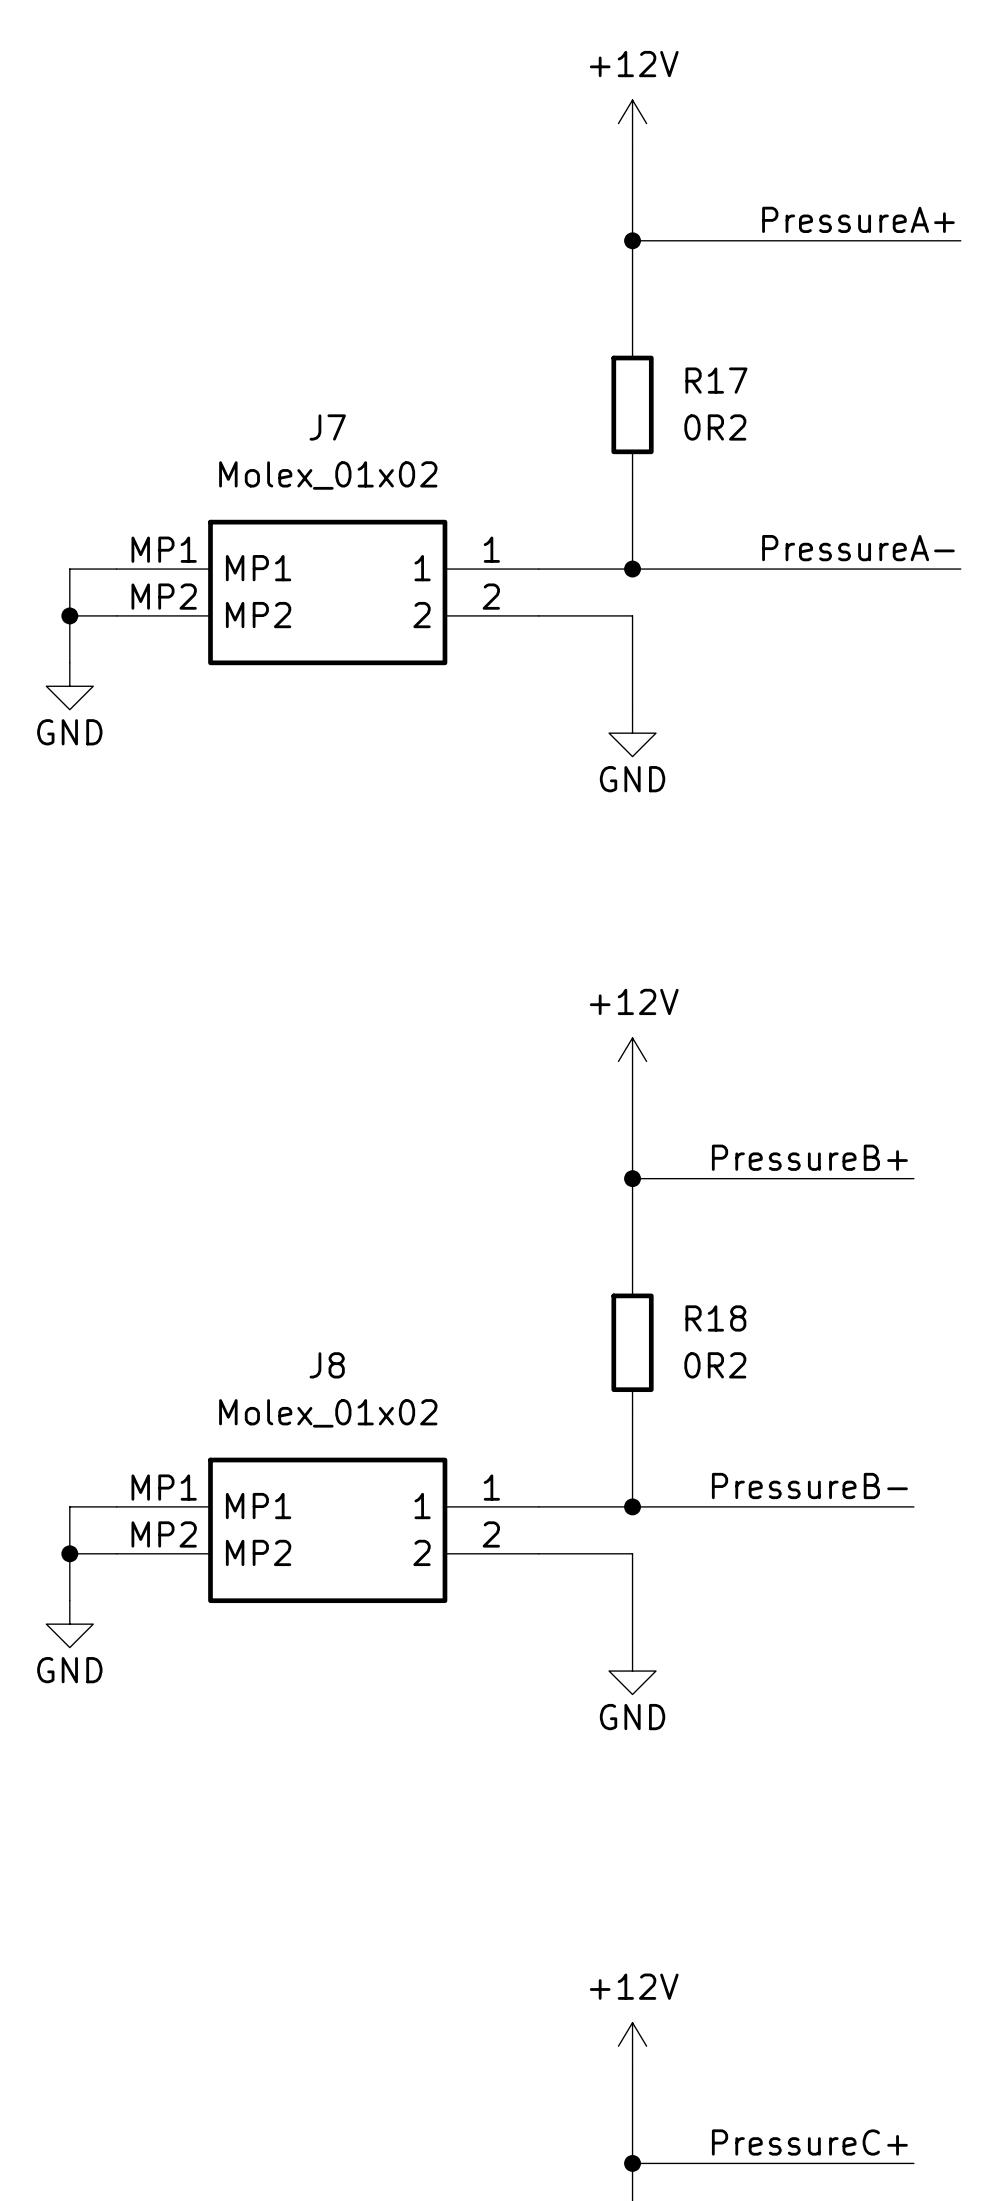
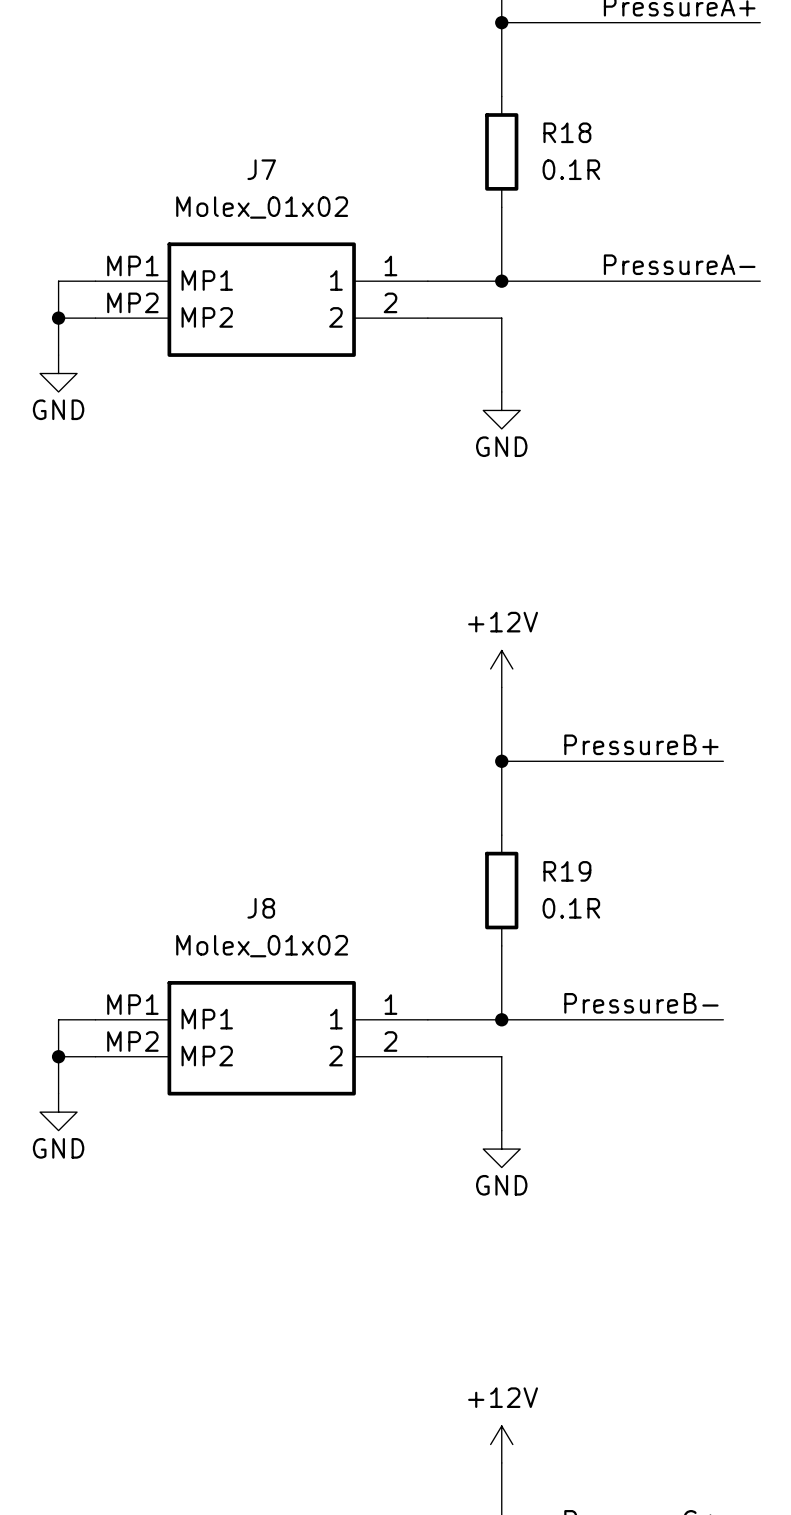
R17 name: R17 (716, 380) -> R18 (567, 132)
R17 value: 0R2 (715, 427) -> 0.1R (571, 169)
R18 name: R18 (715, 1318) -> R19 (567, 871)
R18 value: 0R2 (715, 1365) -> 0.1R (571, 908)

